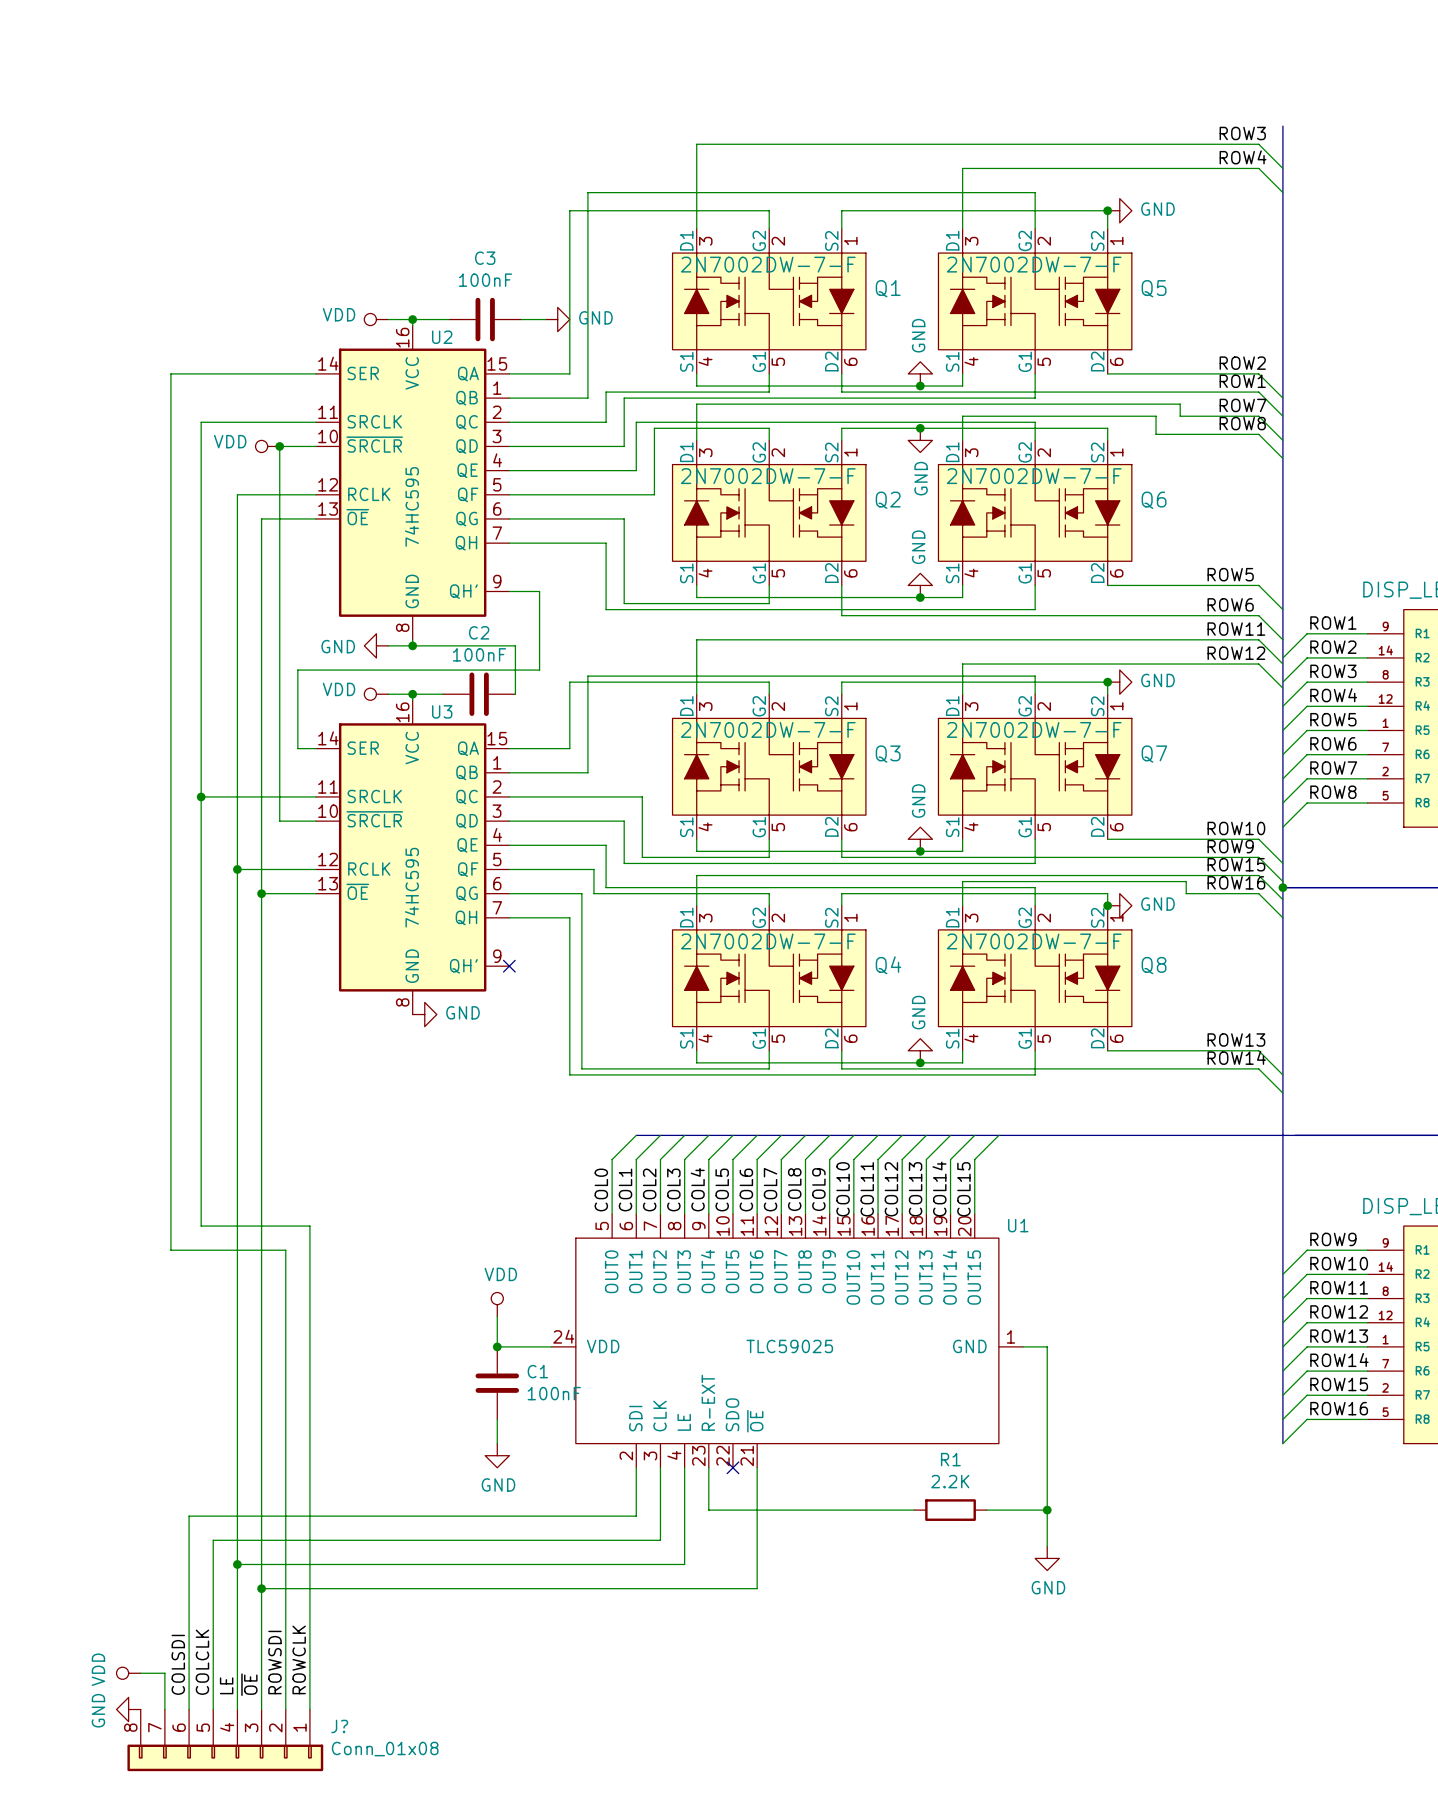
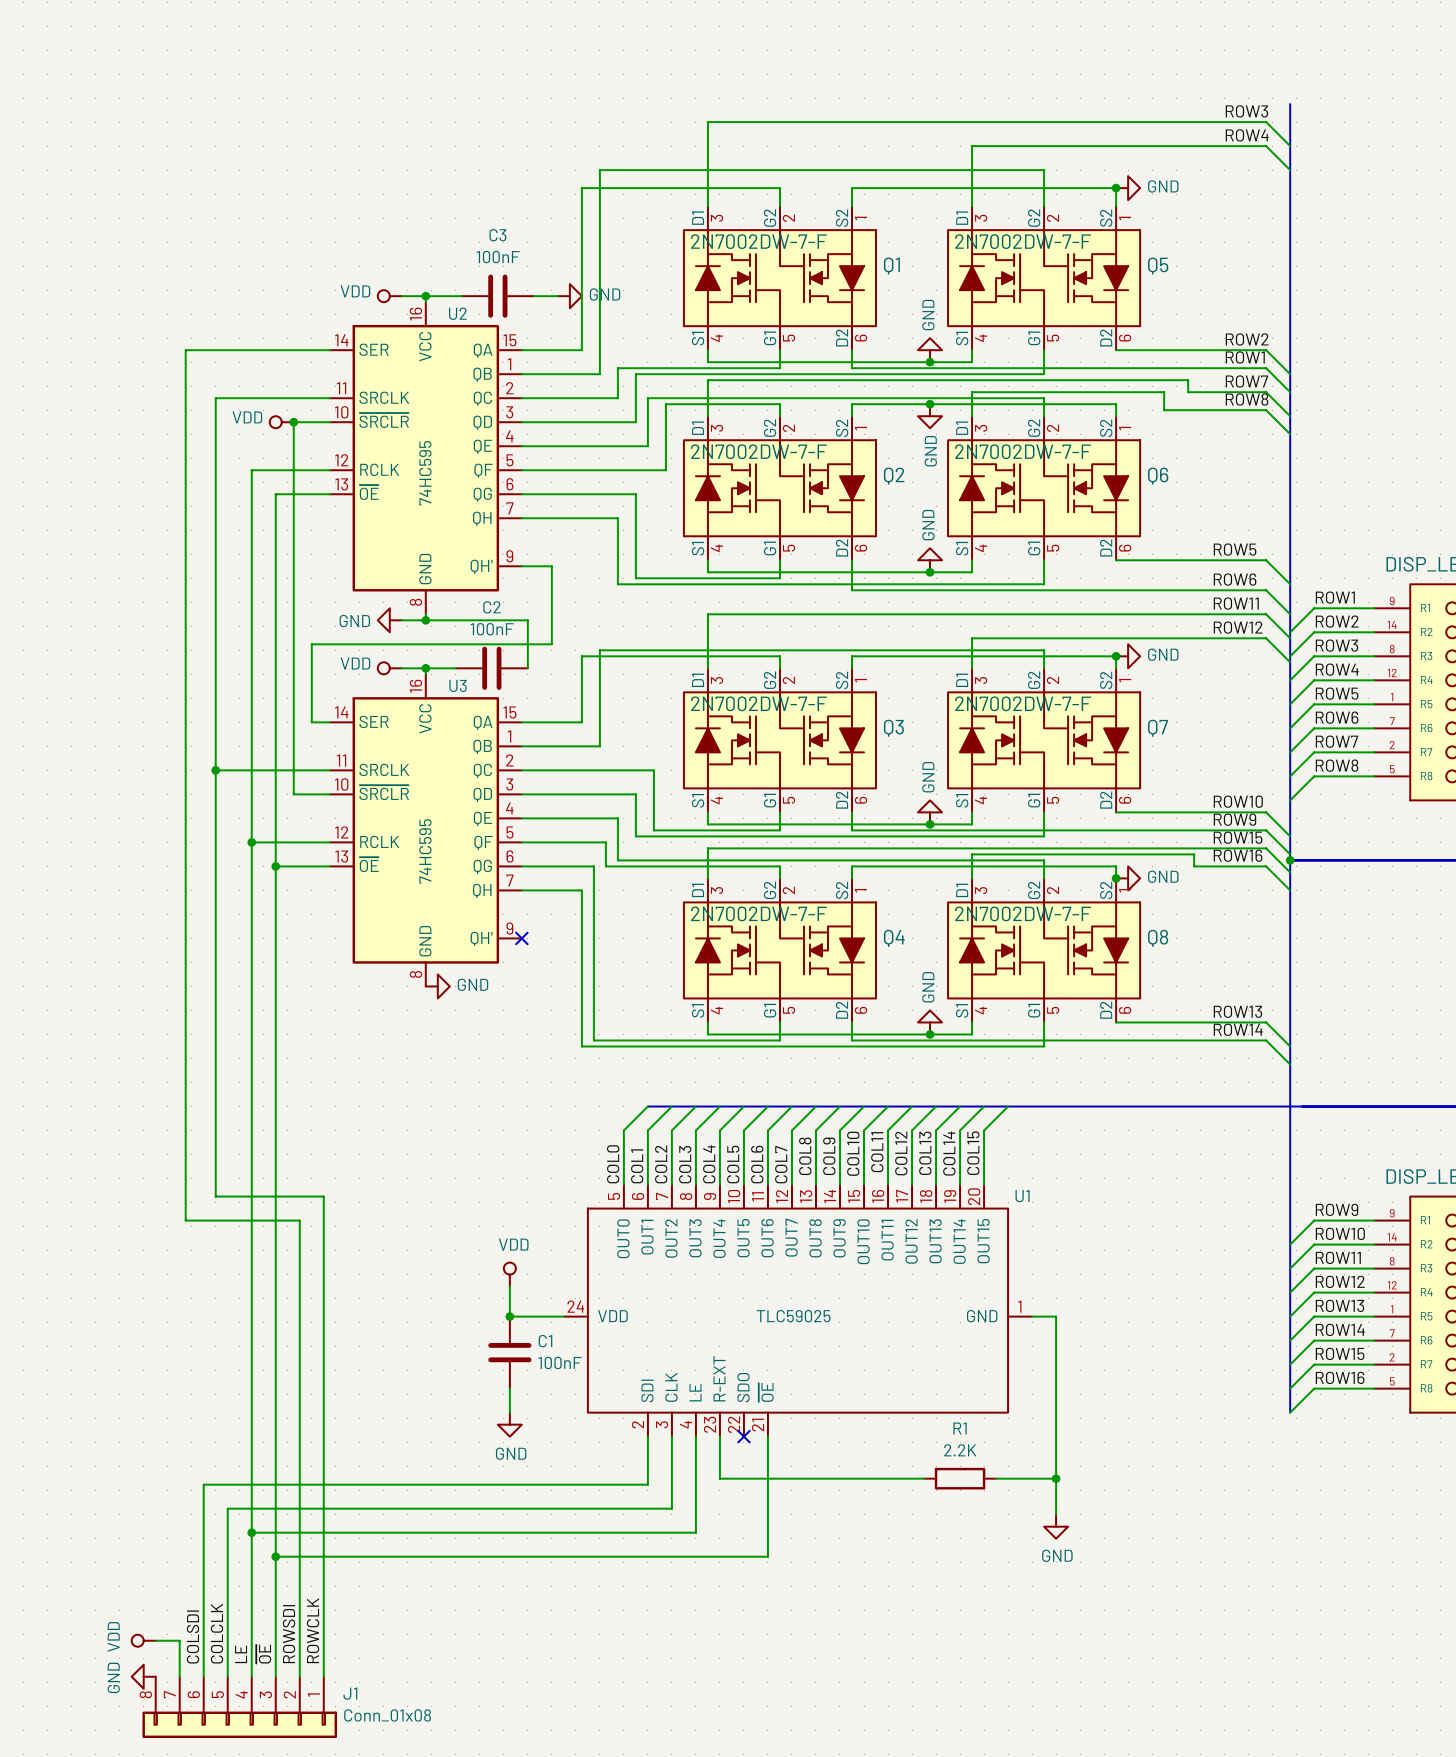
J? name: J? (339, 1726) -> J1 (350, 1693)

